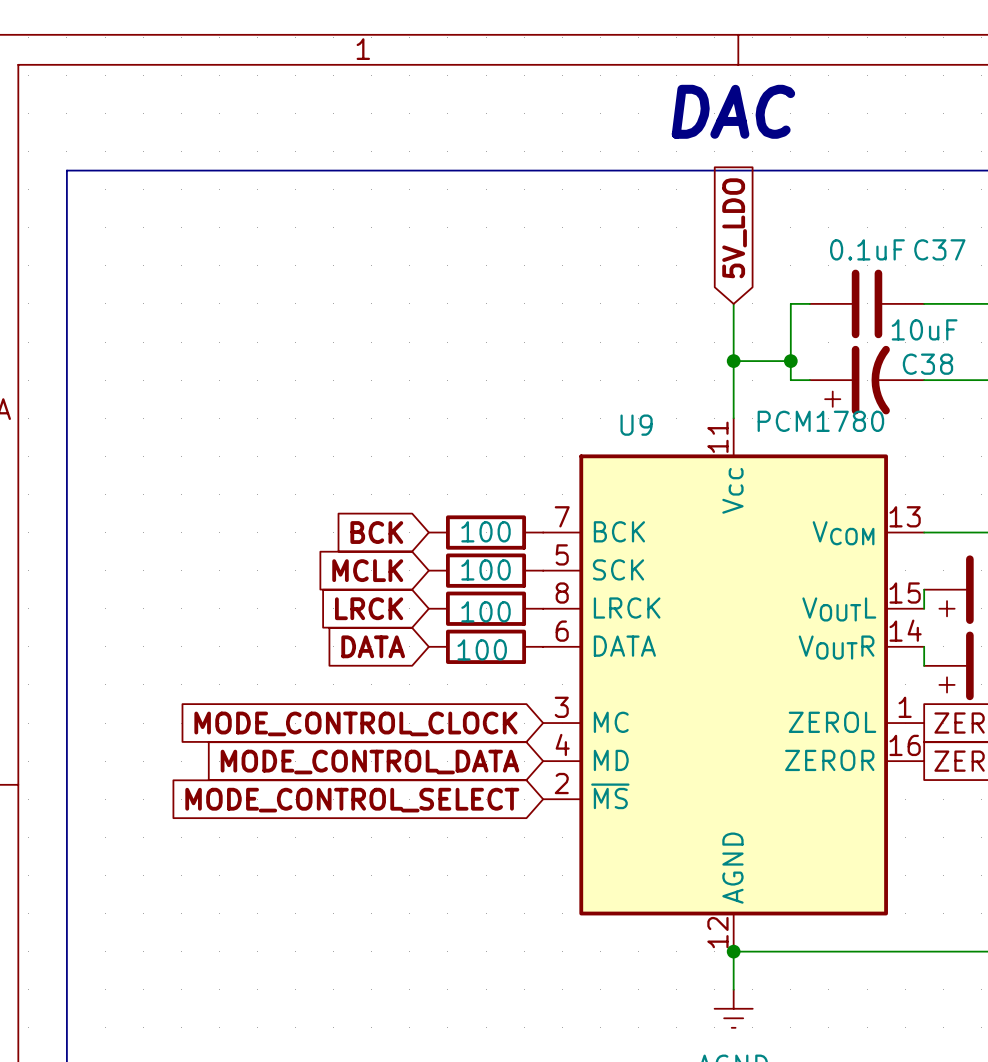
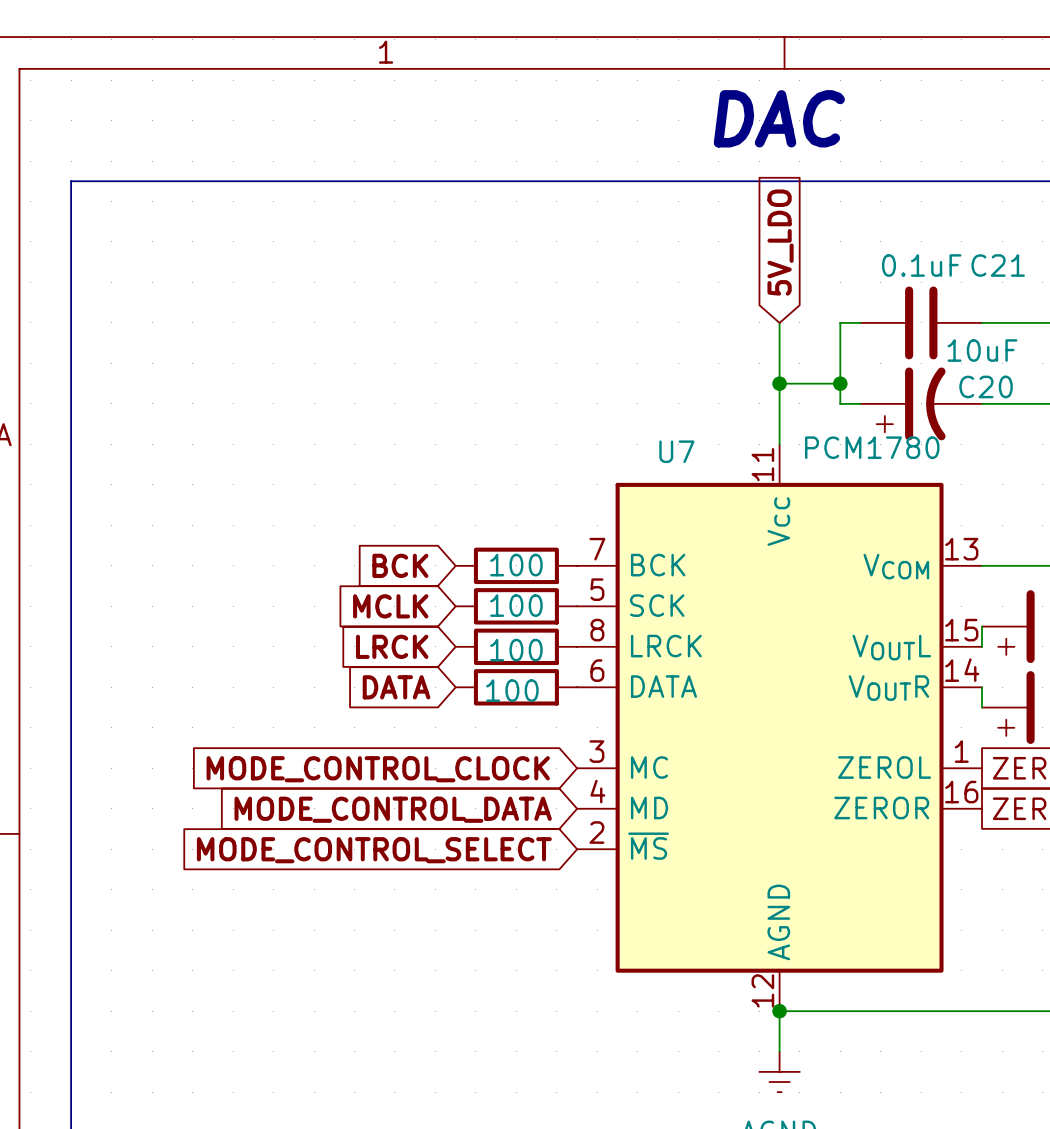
C37 name: C37 (939, 249) -> C21 (998, 265)
C38 name: C38 (927, 364) -> C20 (986, 386)
U9 name: U9 (636, 425) -> U7 (676, 451)

